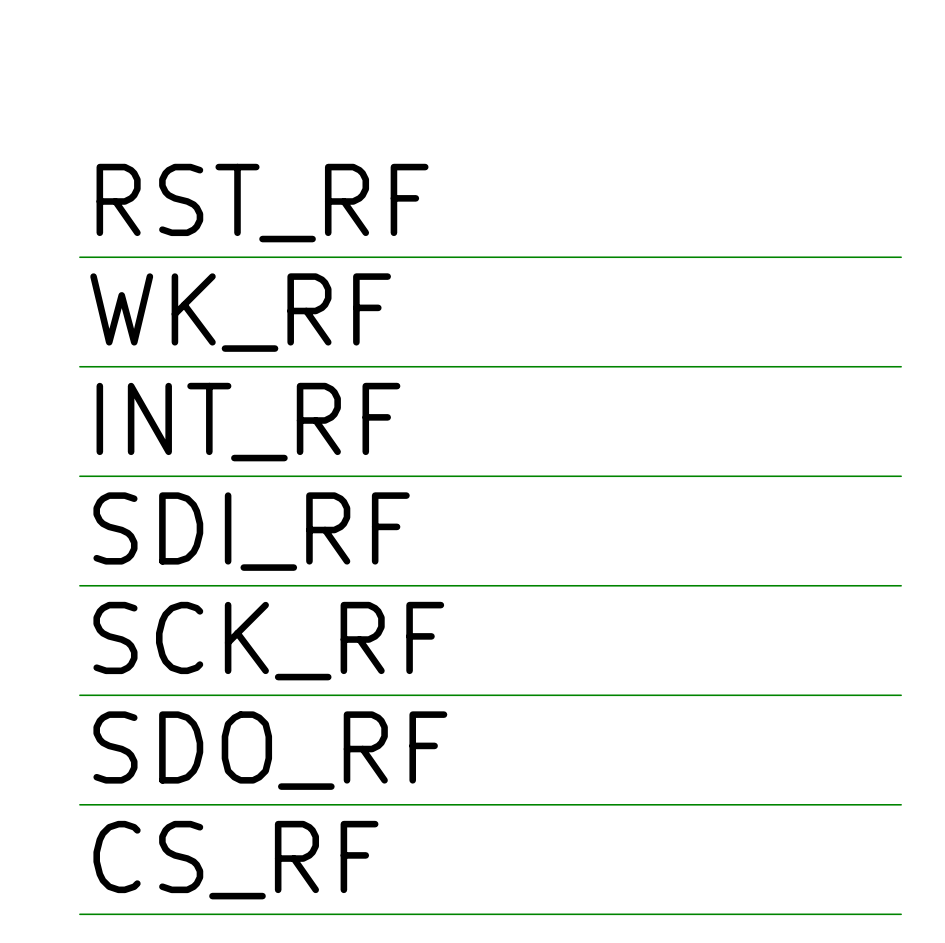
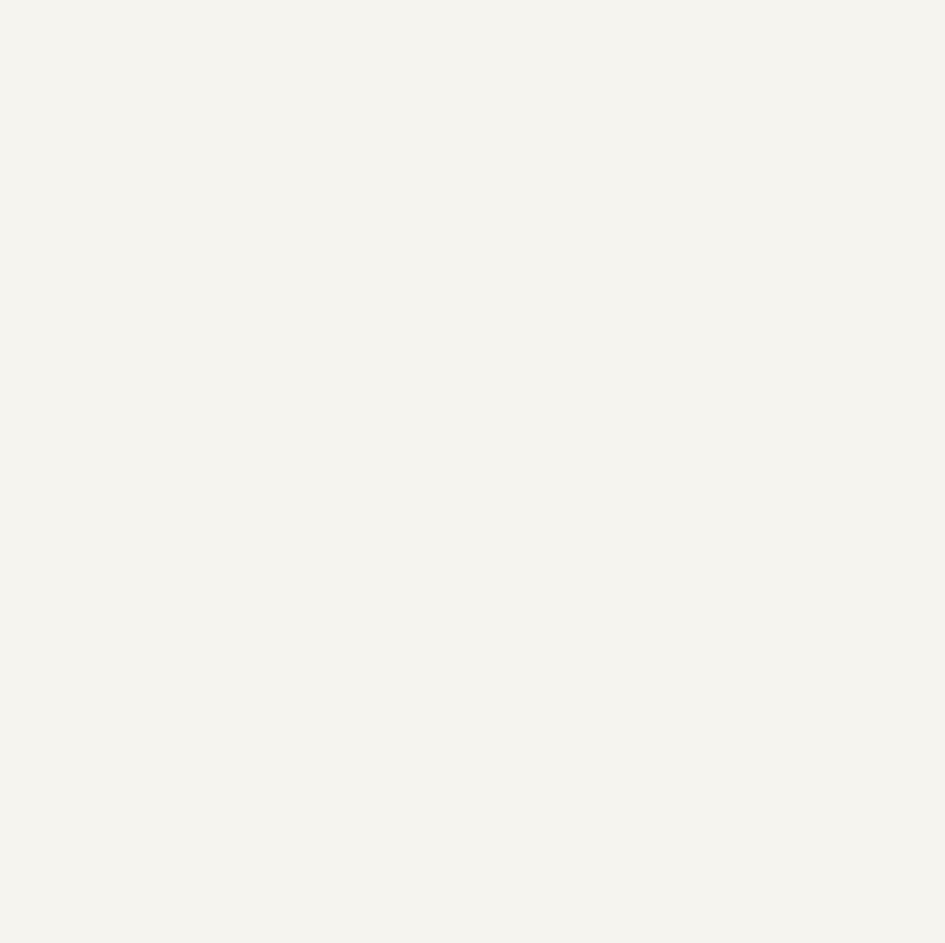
label: RST_RF (262, 203) -> none
wire: (79, 257) (901, 257) -> none
label: WK_RF (240, 312) -> none
wire: (79, 366) (901, 366) -> none
label: INT_RF (248, 422) -> none
wire: (79, 476) (901, 476) -> none
label: SDI_RF (251, 531) -> none
wire: (79, 585) (901, 585) -> none
label: SCK_RF (268, 641) -> none
wire: (79, 695) (901, 695) -> none
label: SDO_RF (270, 750) -> none
wire: (79, 804) (901, 804) -> none
label: CS_RF (235, 860) -> none
wire: (79, 914) (901, 914) -> none

